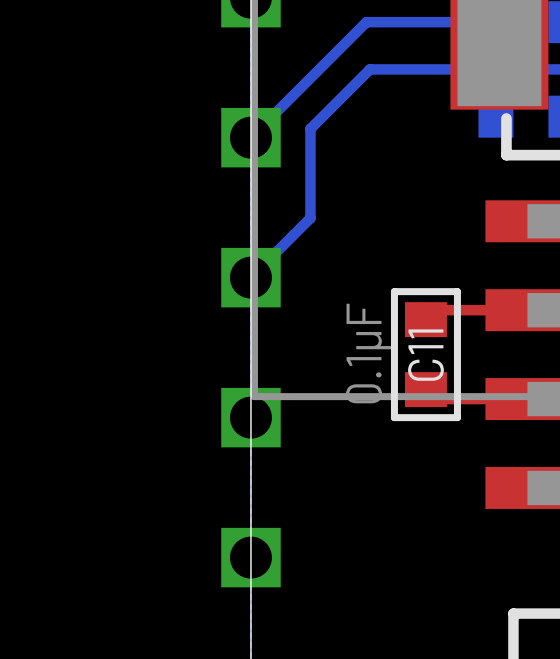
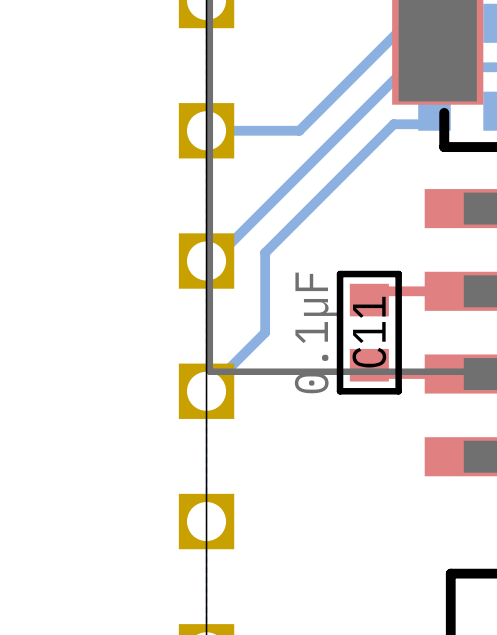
bottom track: (466, 22) (366, 22) (250, 137) -> (406, 23) (299, 130) (206, 130)
bottom track: (466, 69) (369, 69) (310, 128) (310, 218) (250, 277) -> (406, 67) (213, 261) (206, 261)
bottom track: none -> (434, 111) (434, 117) (427, 124) (393, 124) (265, 252) (265, 332) (206, 391)

